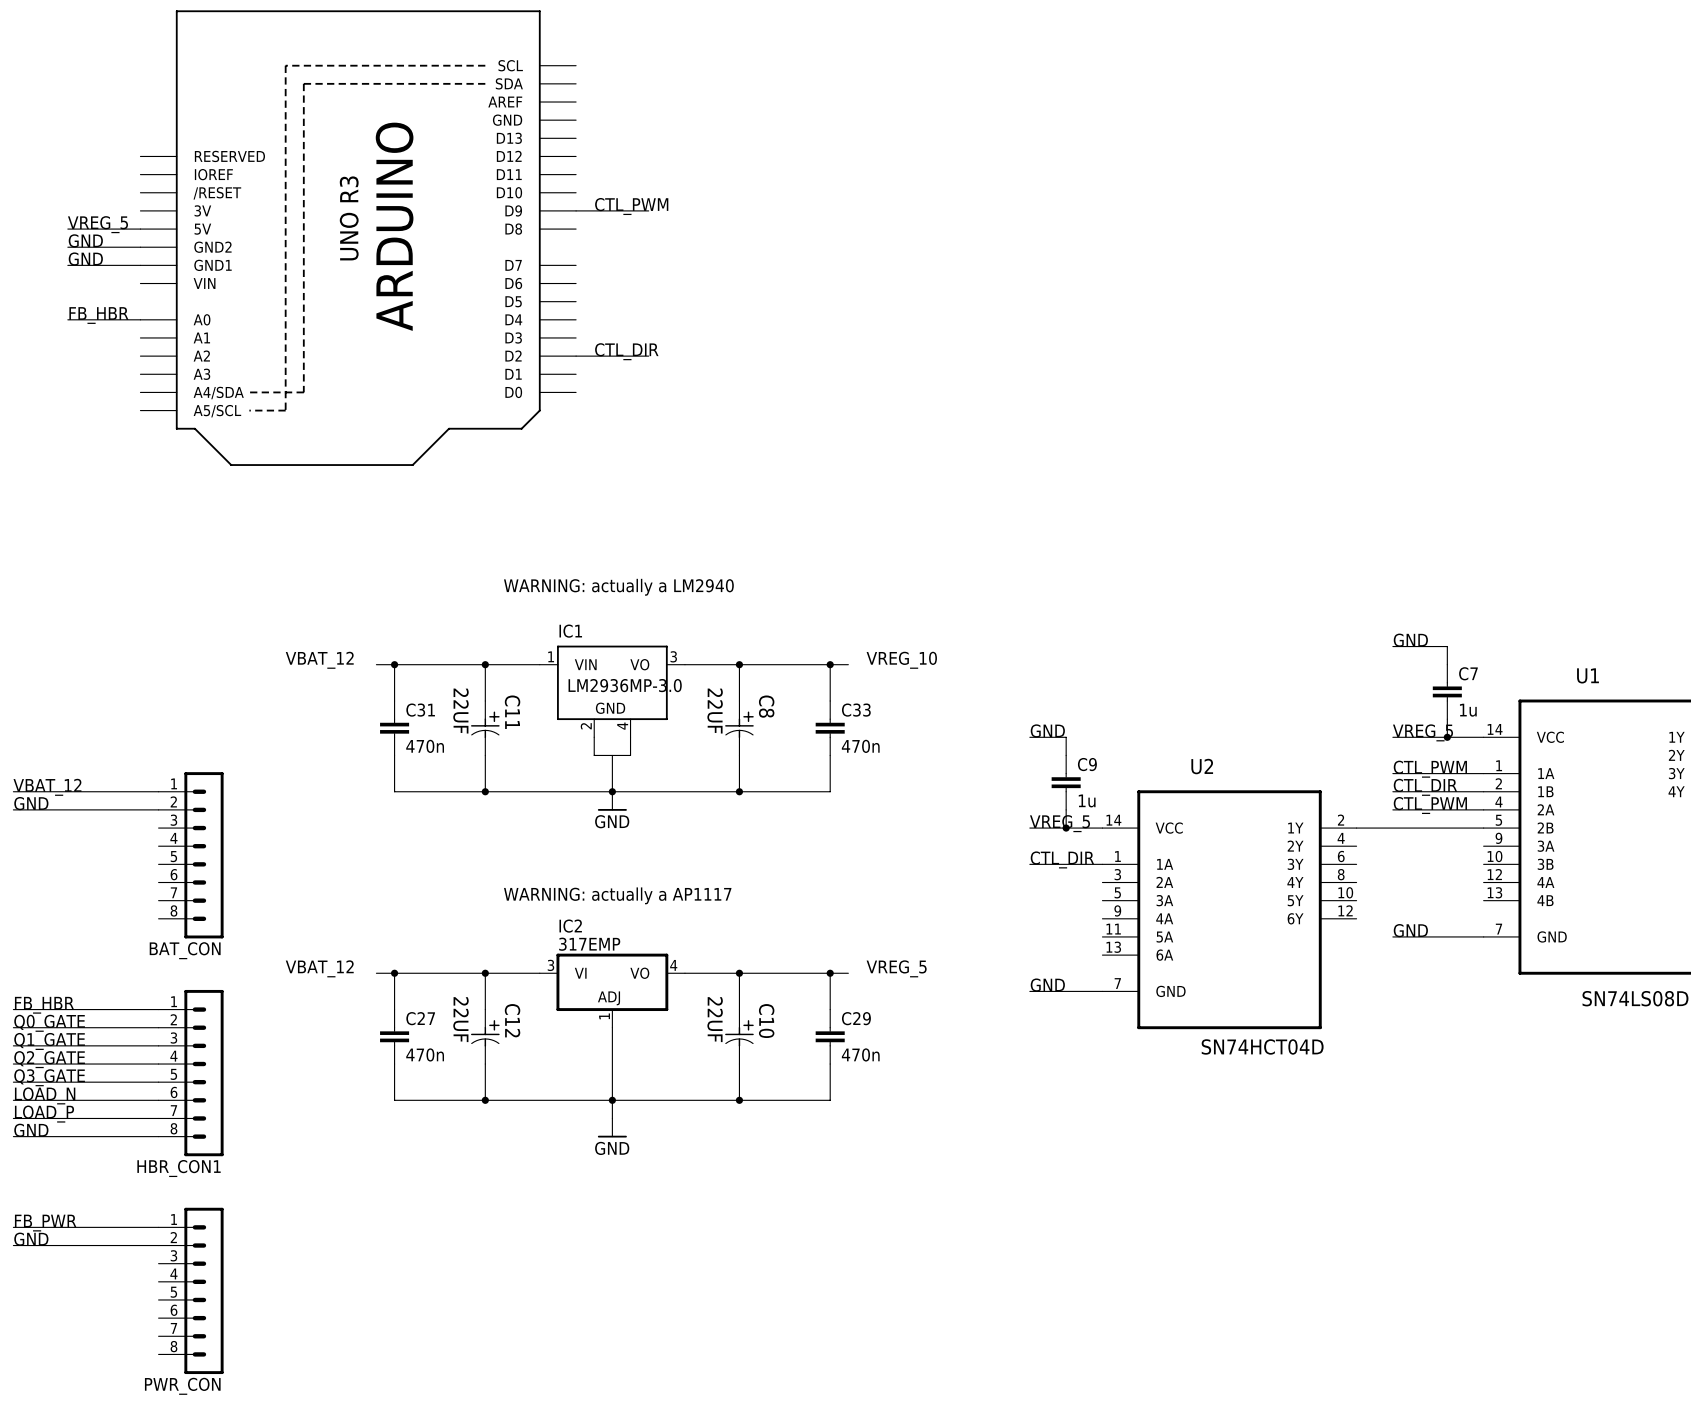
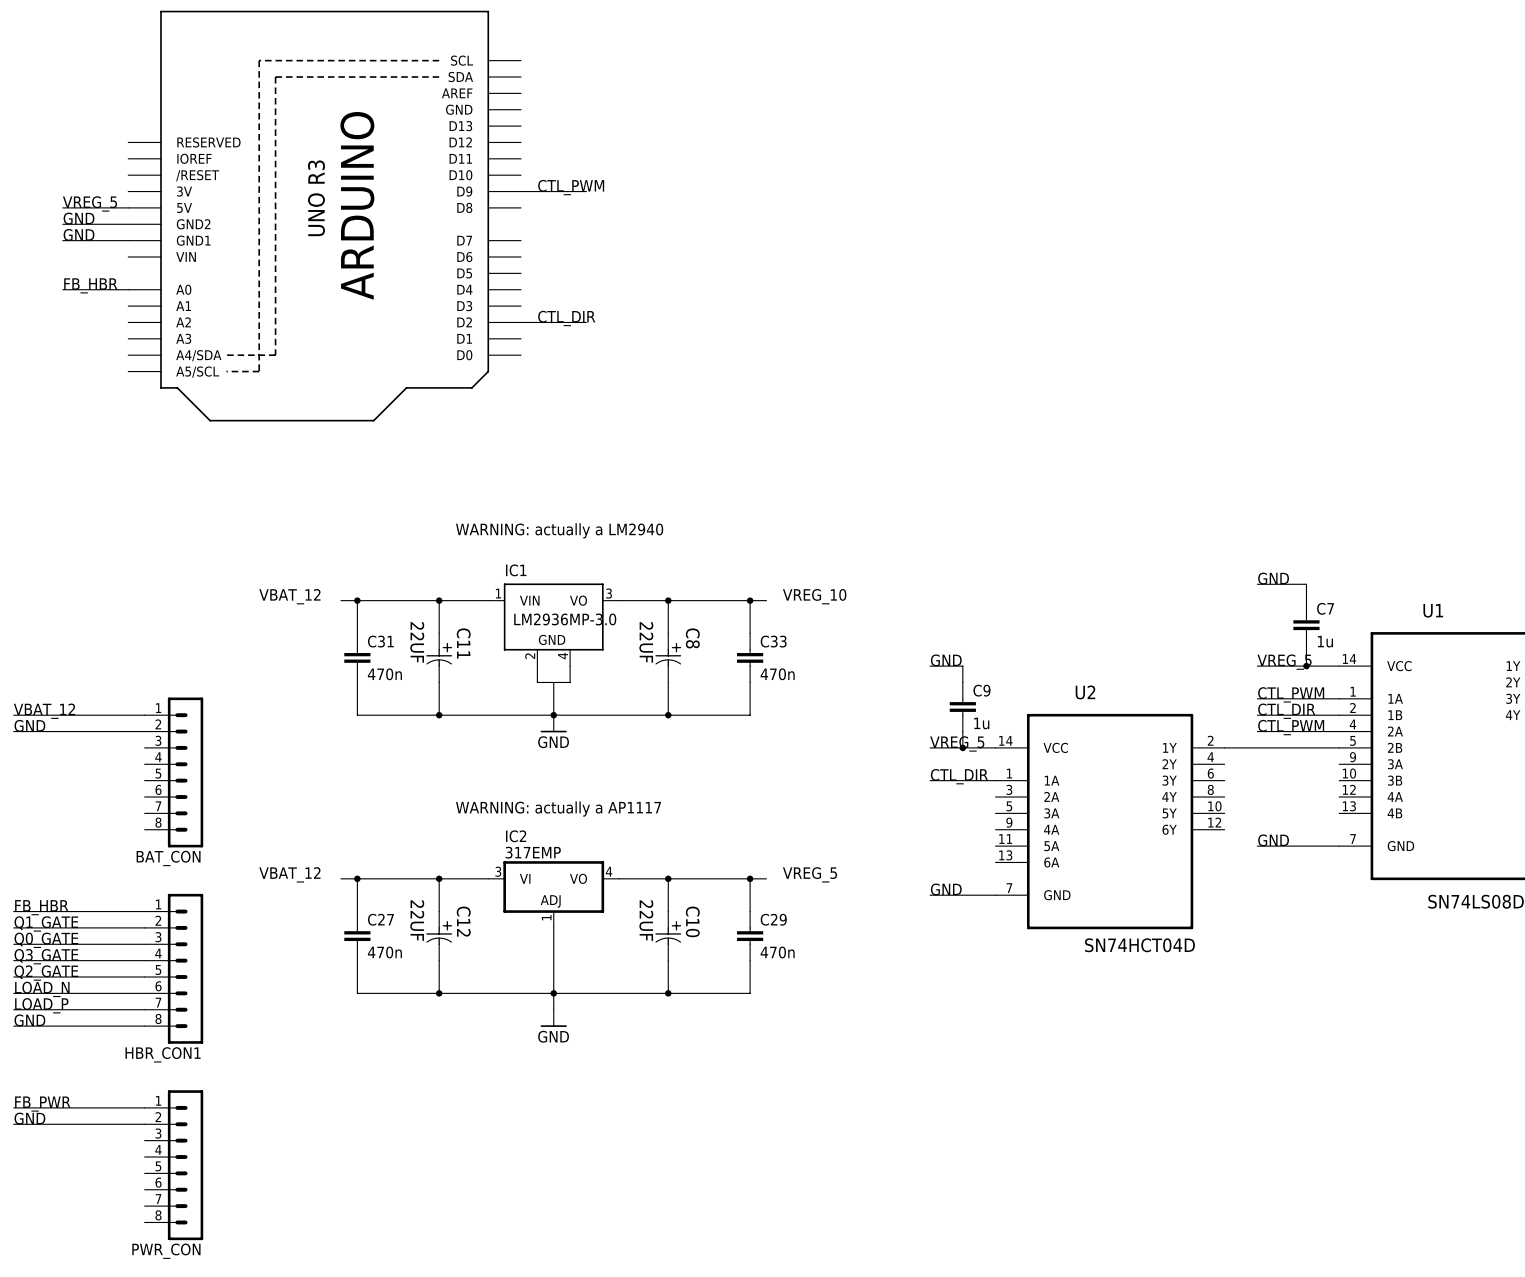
label: Q0_GATE (49, 1023) -> Q1_GATE (46, 923)
label: Q1_GATE (49, 1041) -> Q0_GATE (46, 940)
label: Q2_GATE (49, 1059) -> Q3_GATE (46, 956)
label: Q3_GATE (49, 1077) -> Q2_GATE (46, 973)

